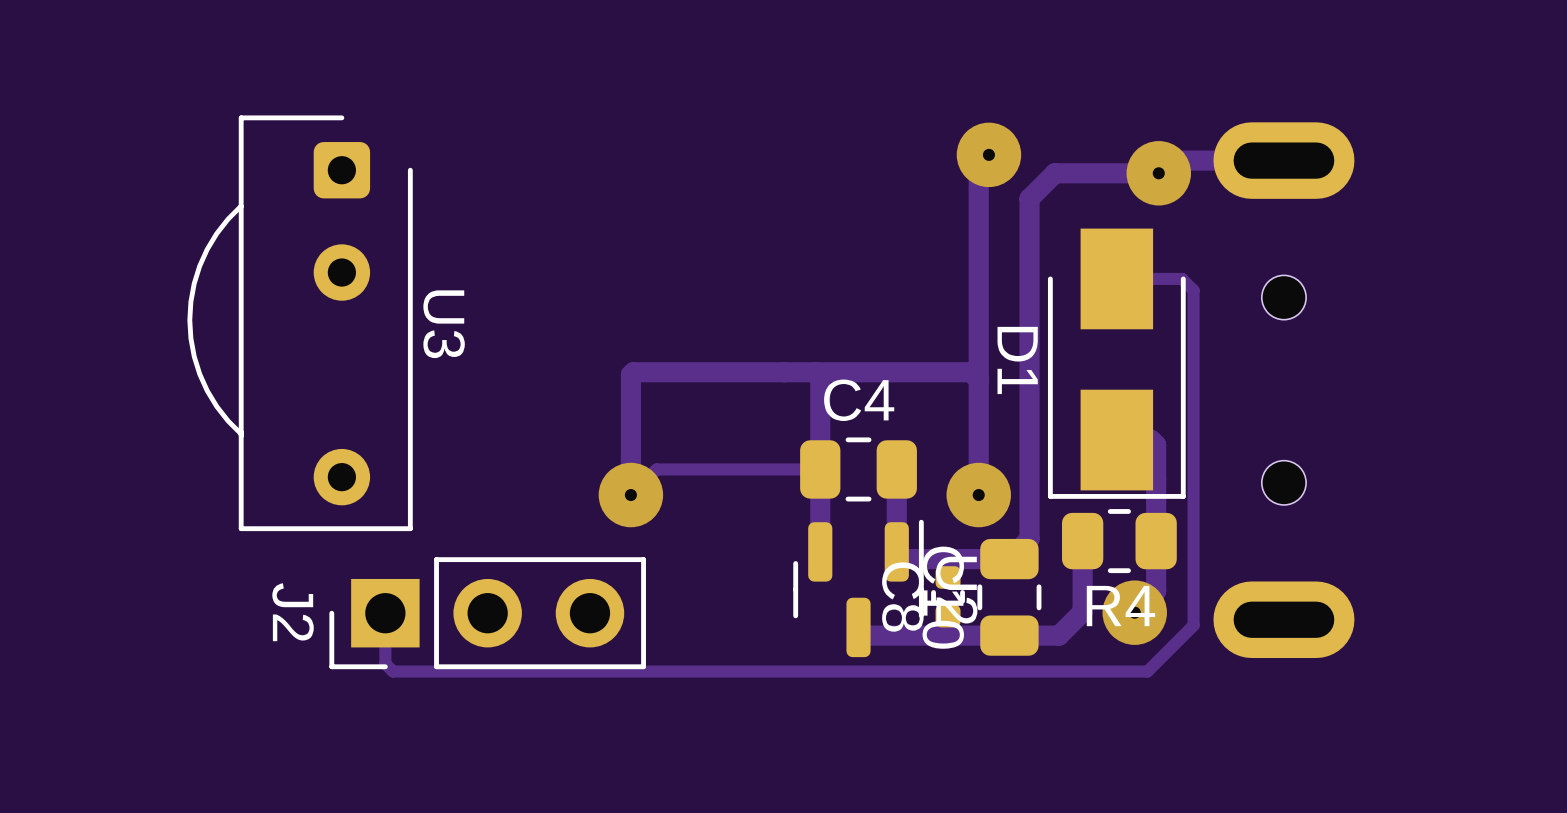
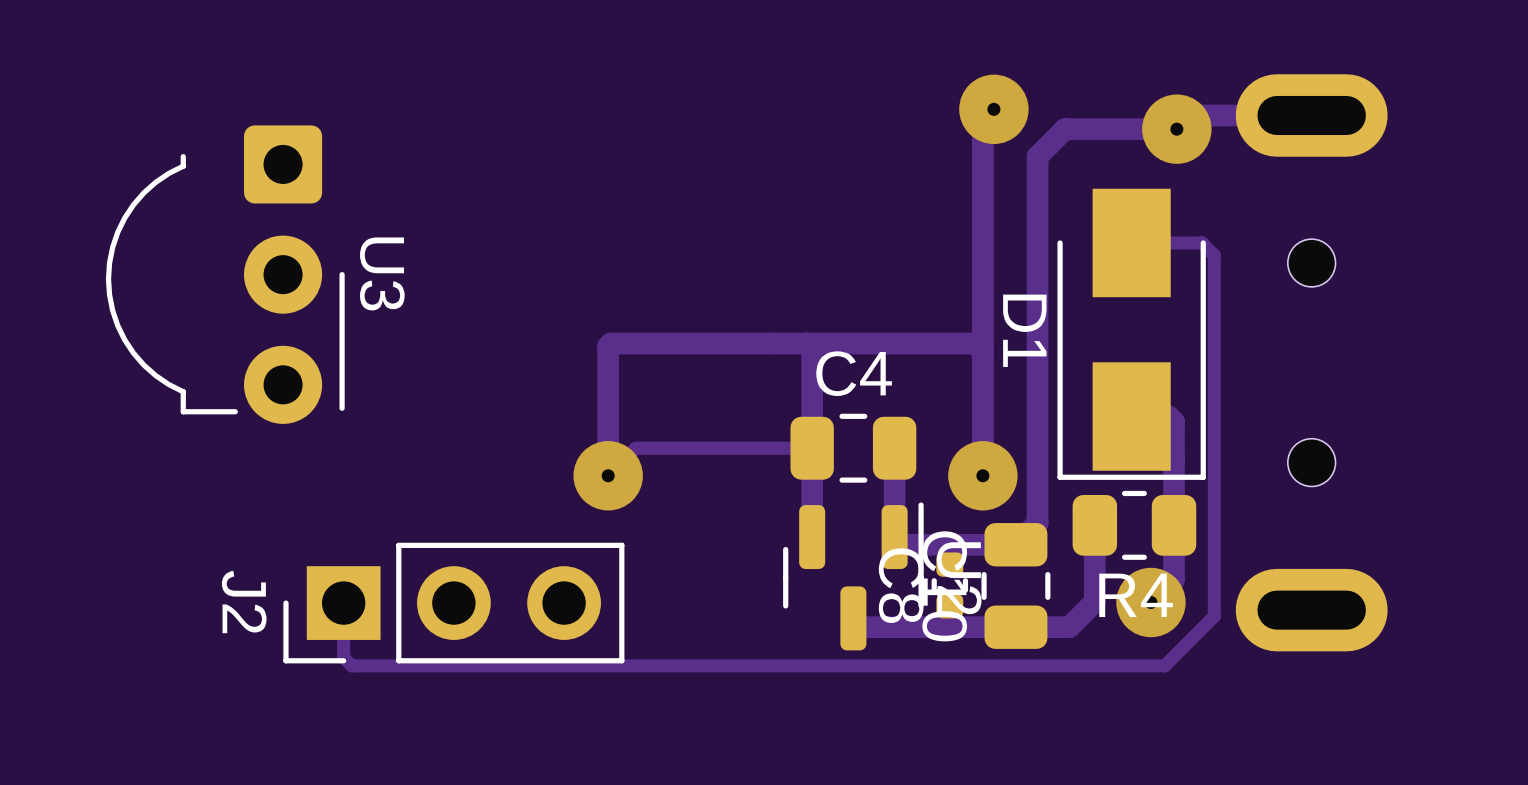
U3 footprint: [187, 115, 413, 532] -> [105, 125, 345, 424]

